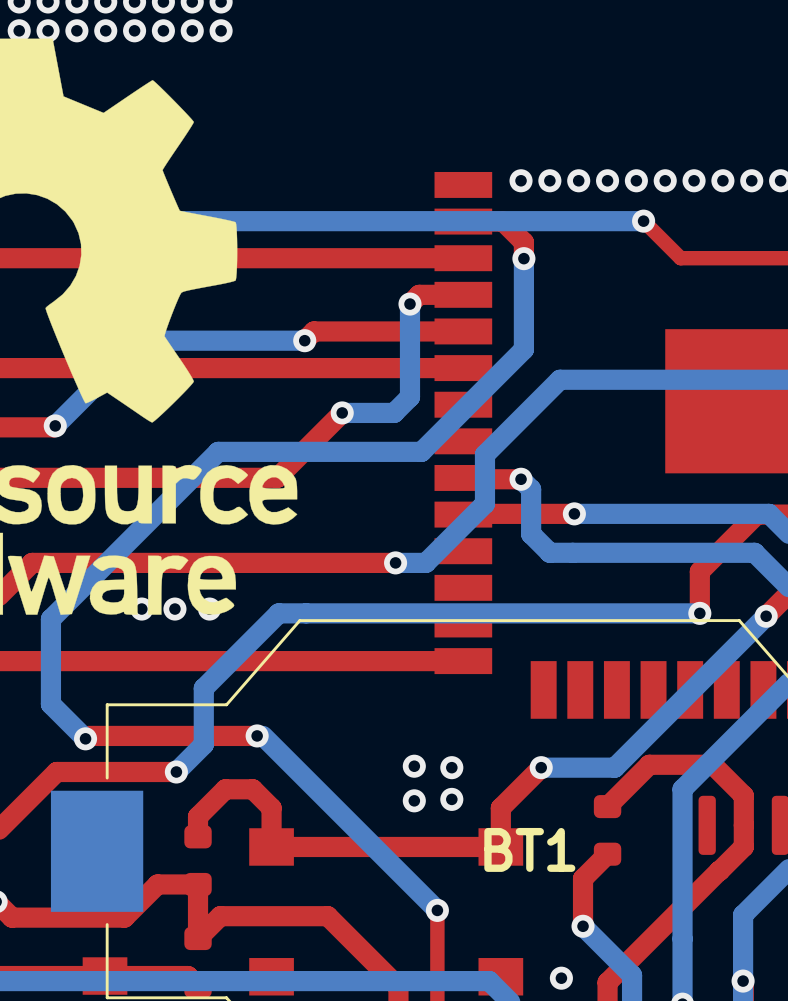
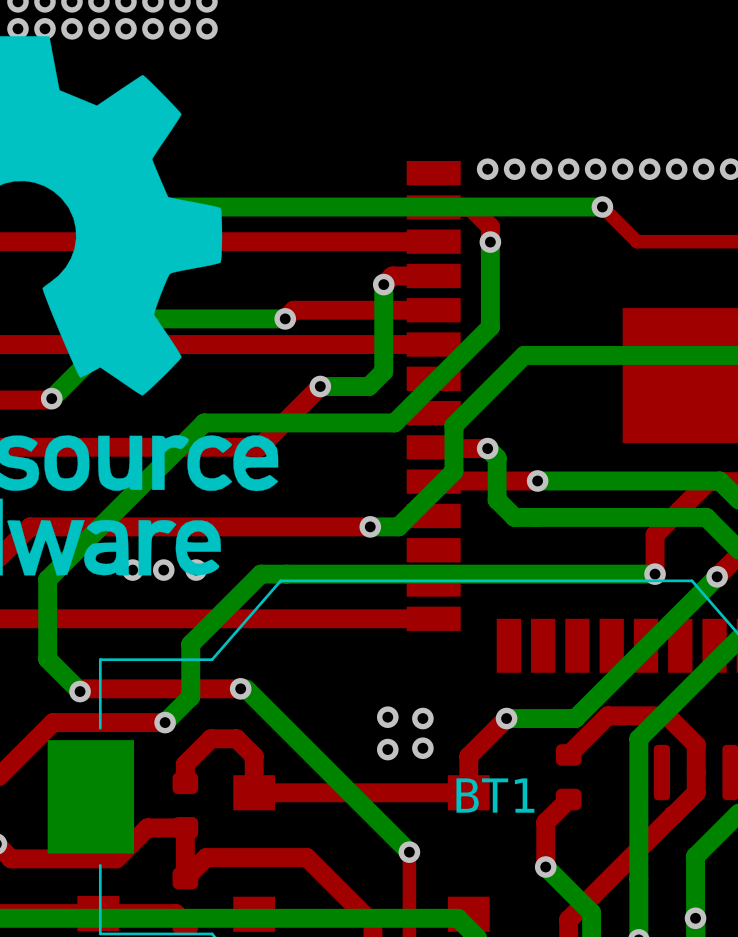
via: (561, 978) -> none

